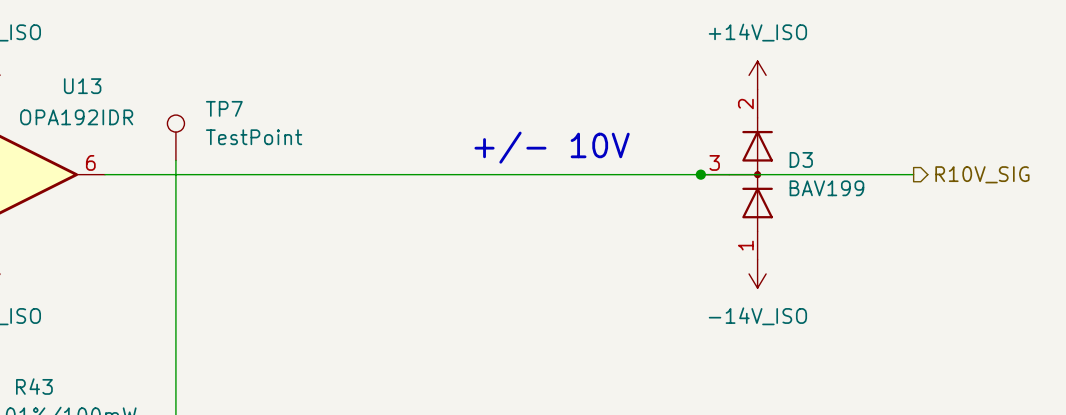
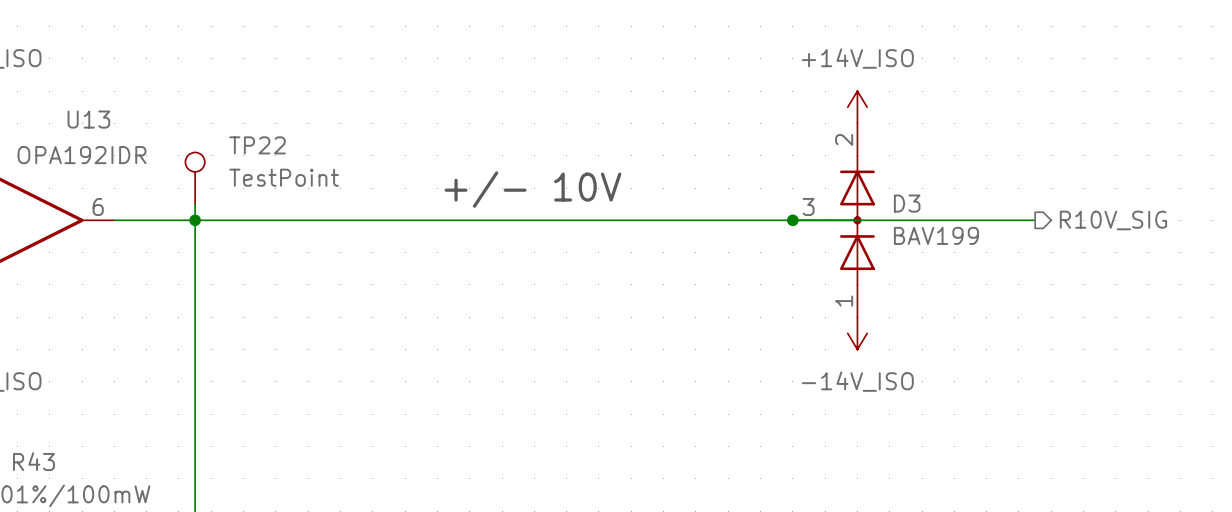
TP7 name: TP7 (224, 108) -> TP22 (257, 145)
text position: +/- 10V (552, 147) -> +/- 10V (532, 189)
junction: none -> (195, 220)

